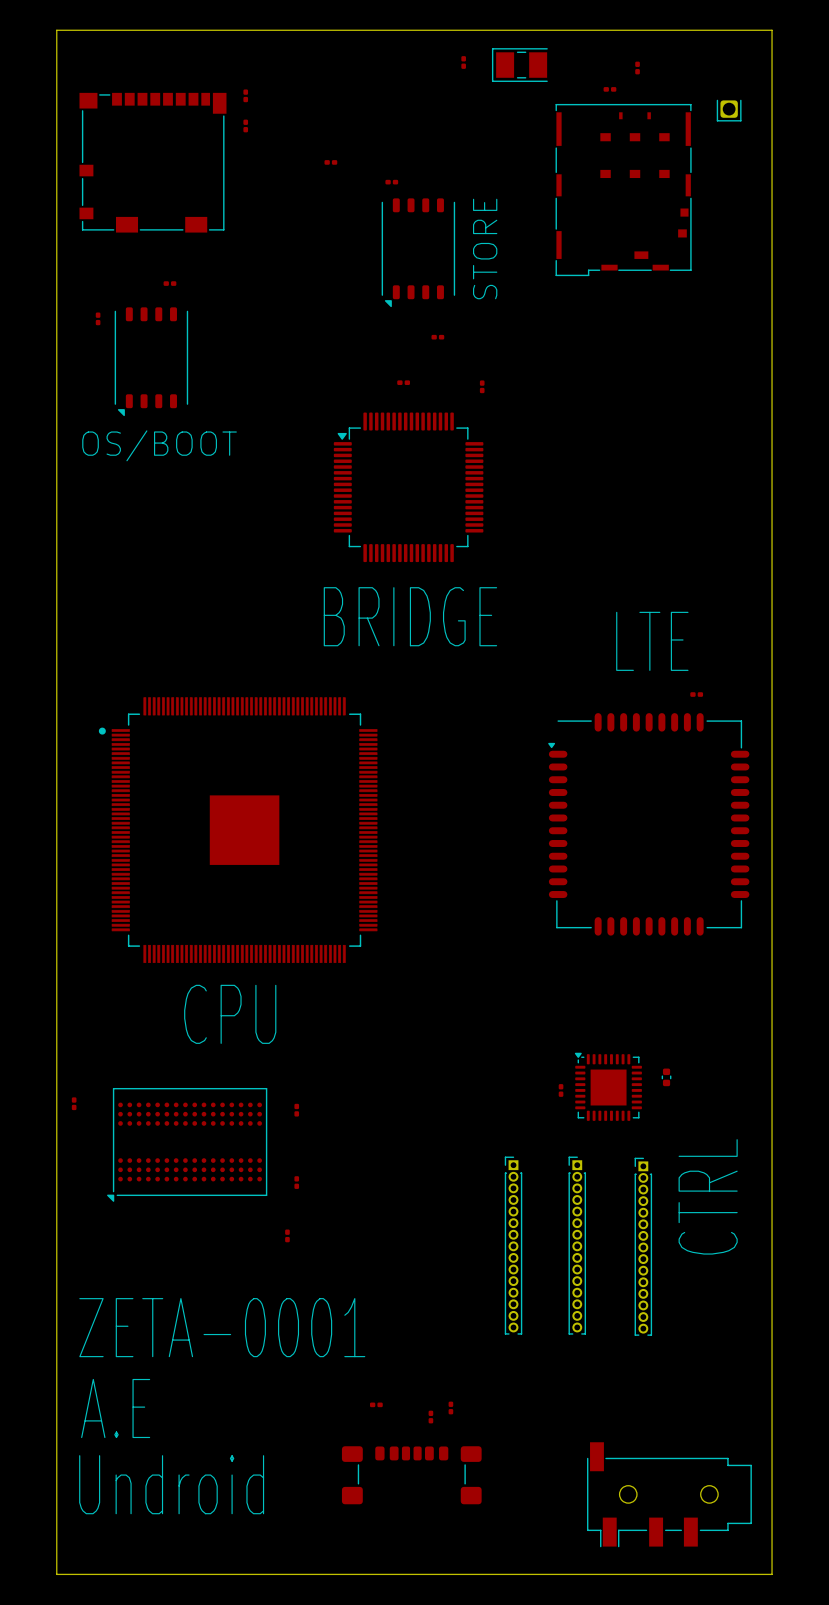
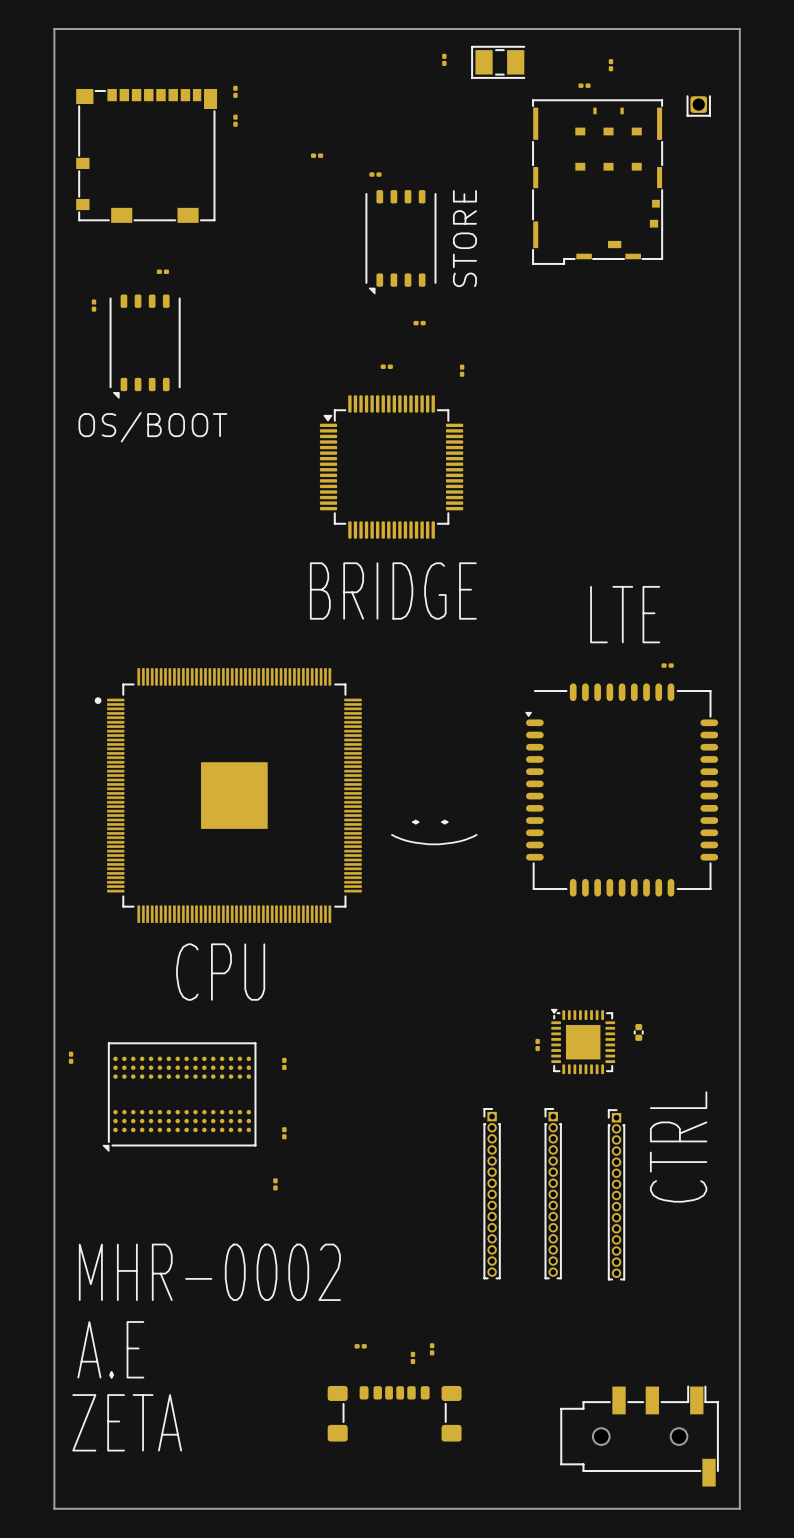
text: none -> :) (434, 832)
text: ZETA-0001 (222, 1327) -> MHR-0002 (209, 1272)
text: Undroid (171, 1484) -> ZETA (127, 1422)
part rotation: 0° (669, 1494) -> 180° (639, 1436)

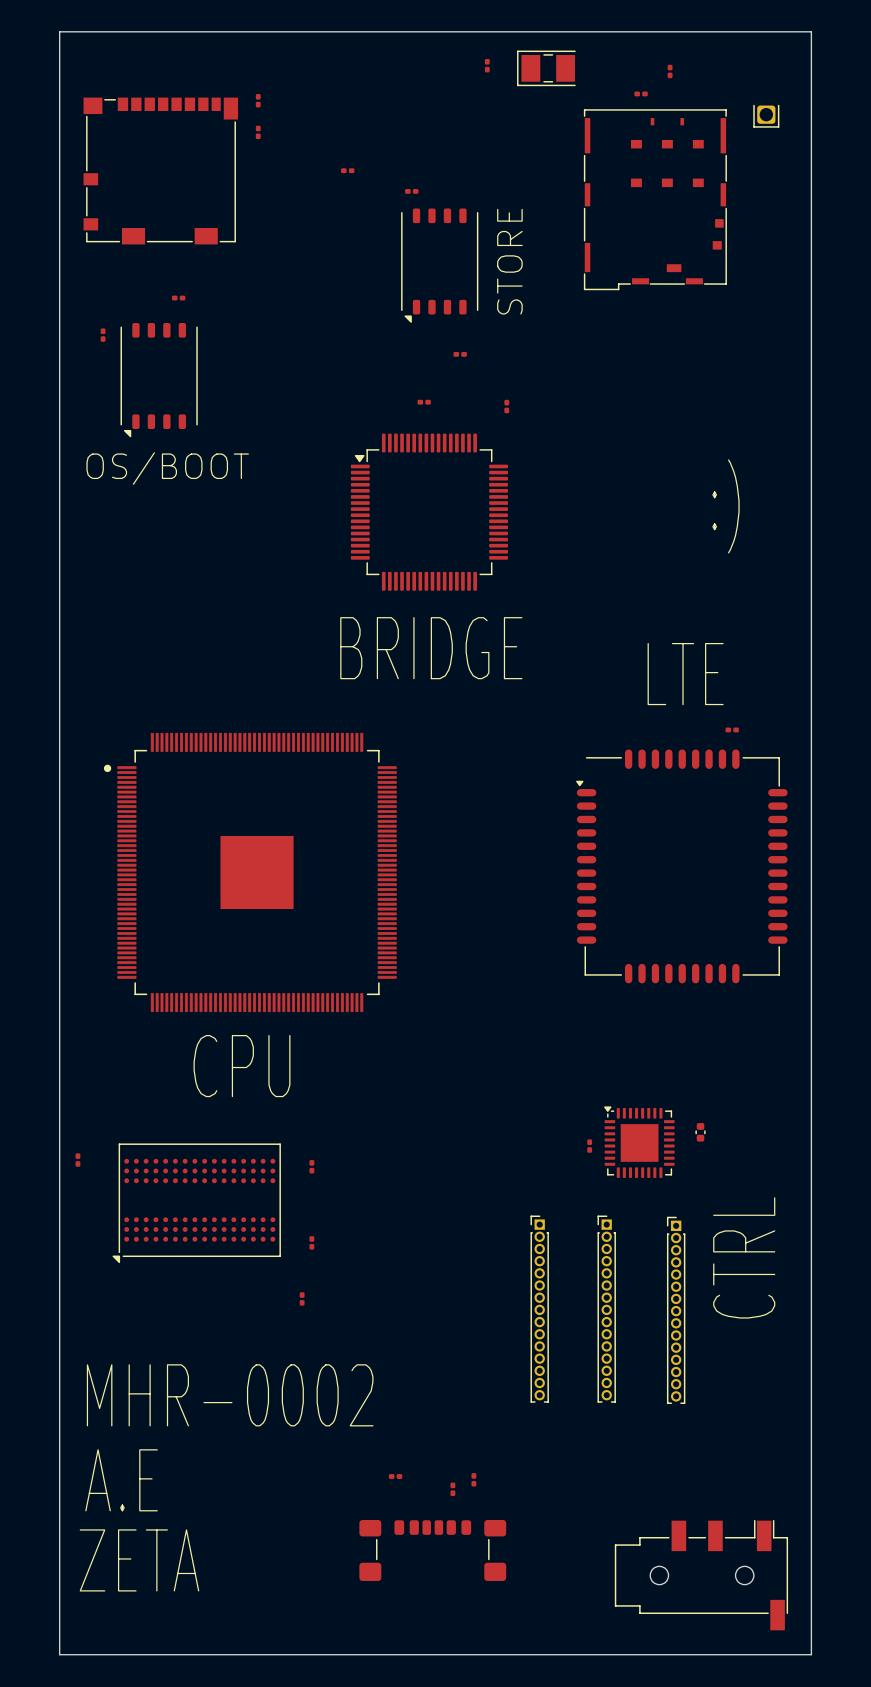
text: none -> :) (725, 506)
text: :) (434, 832) -> none

